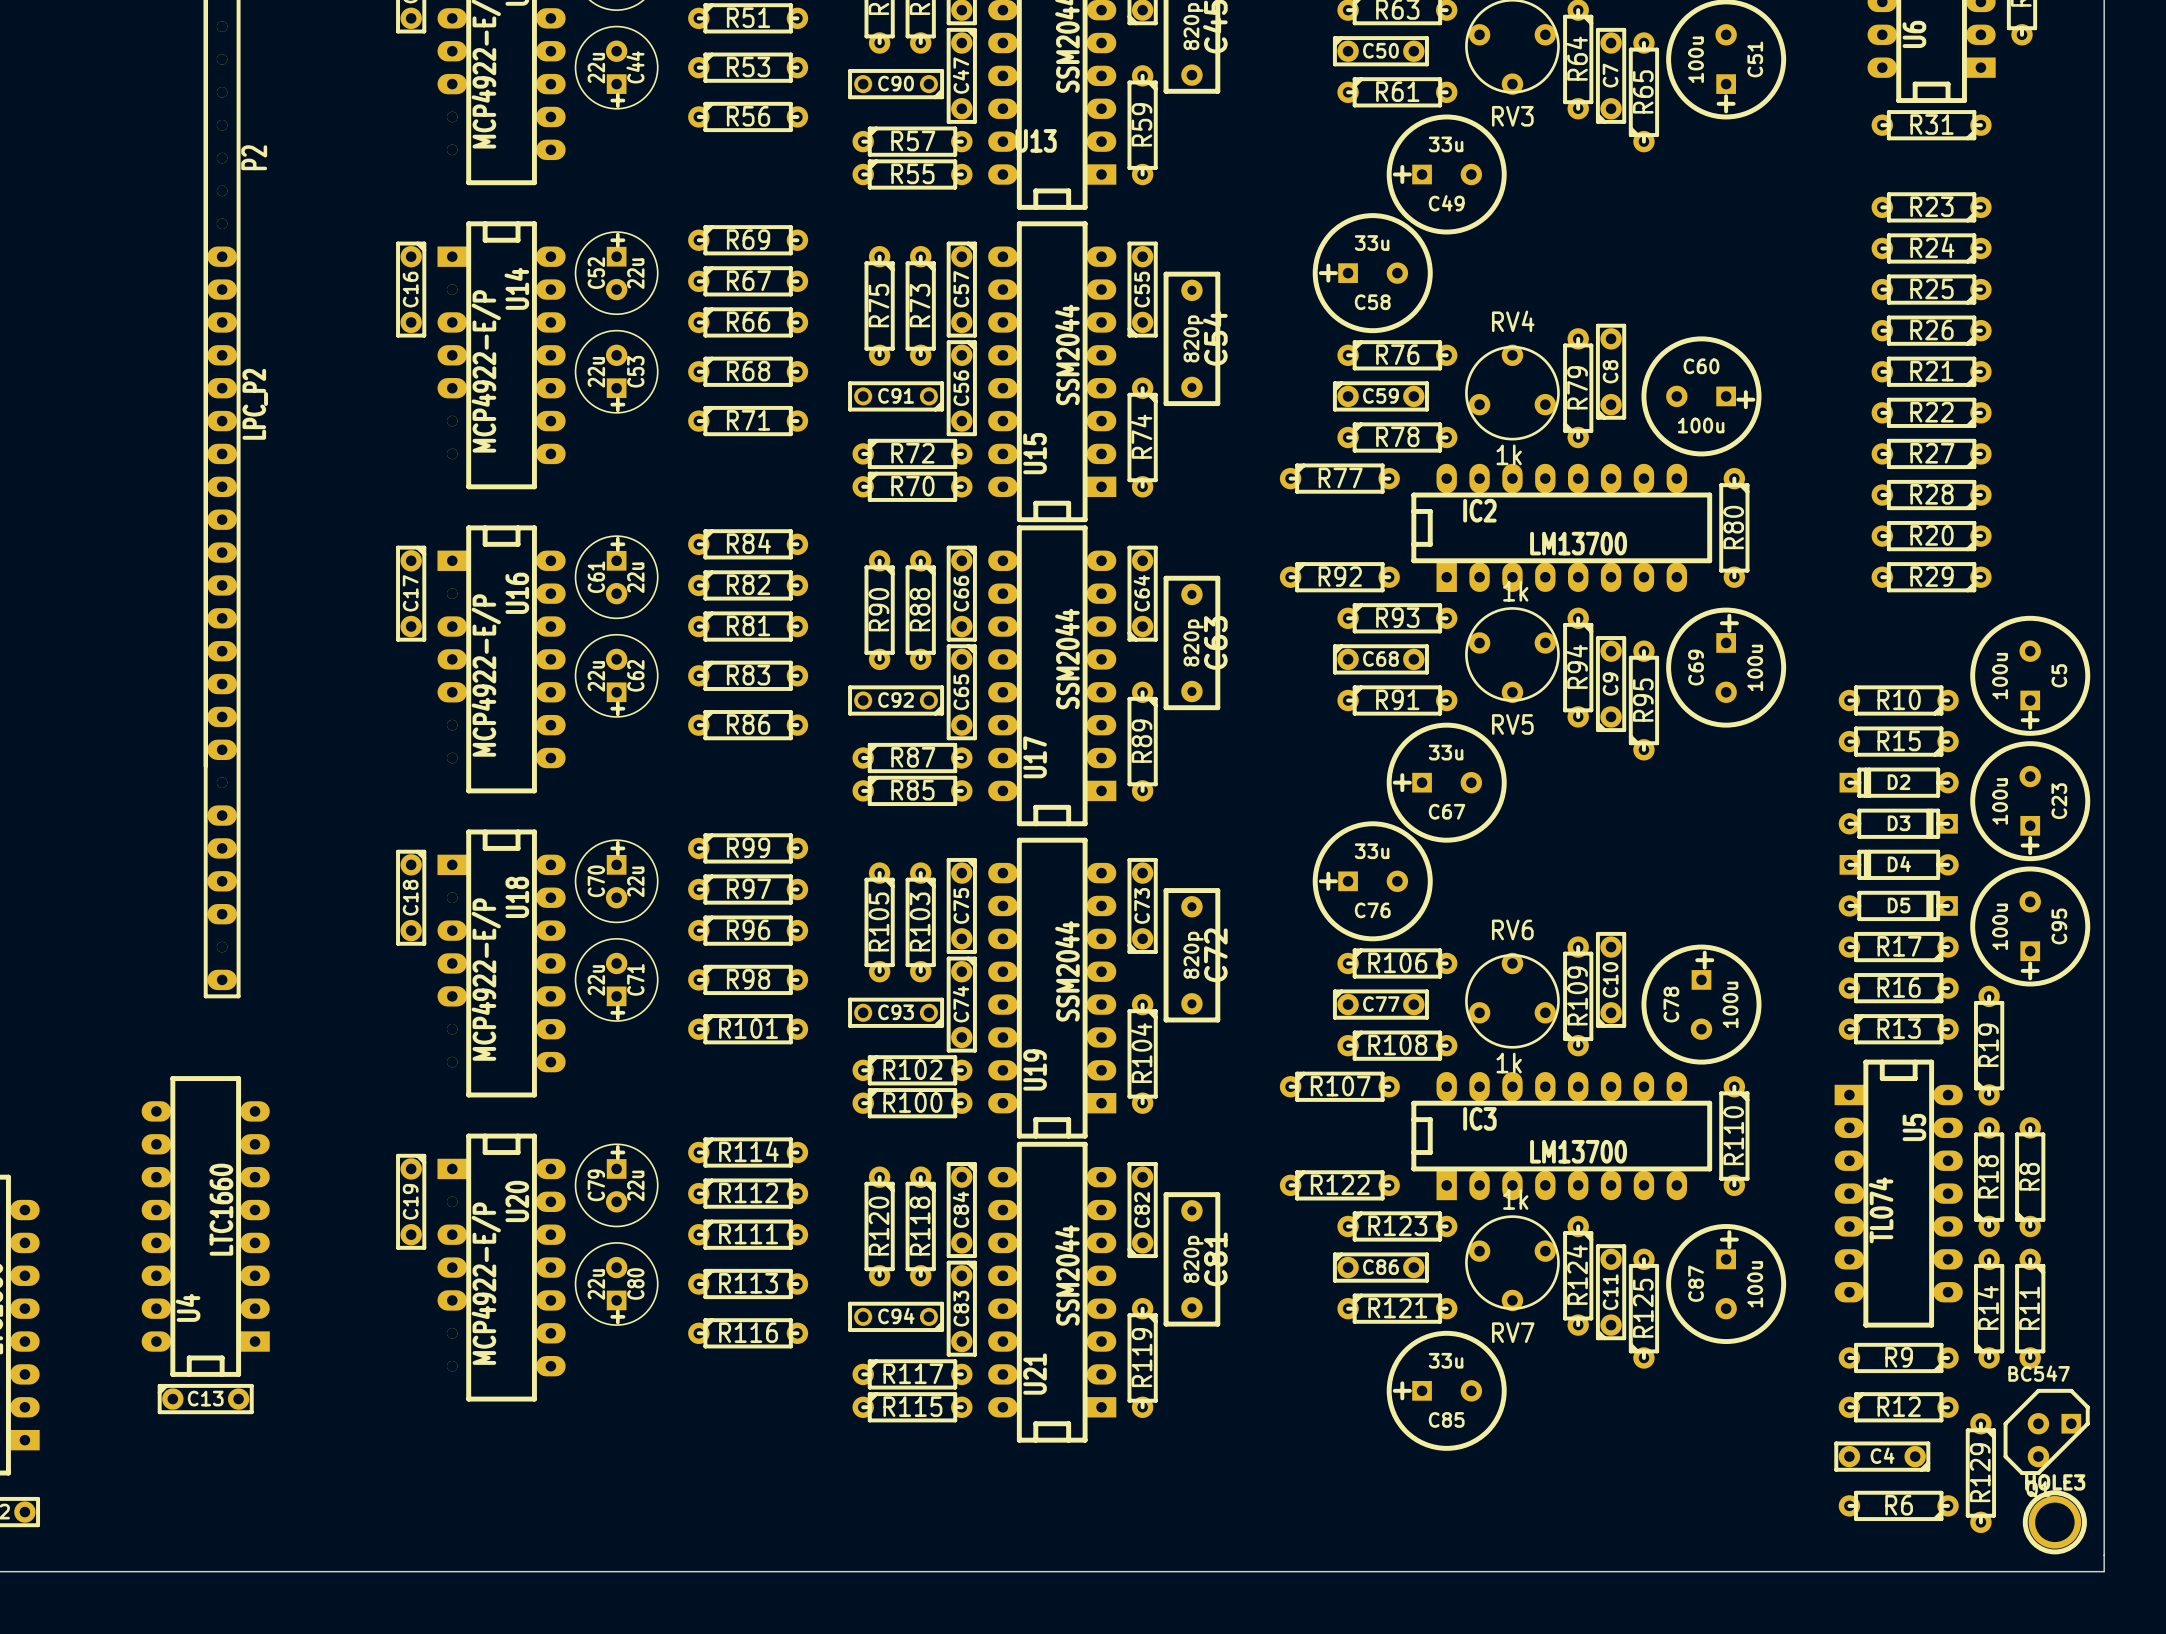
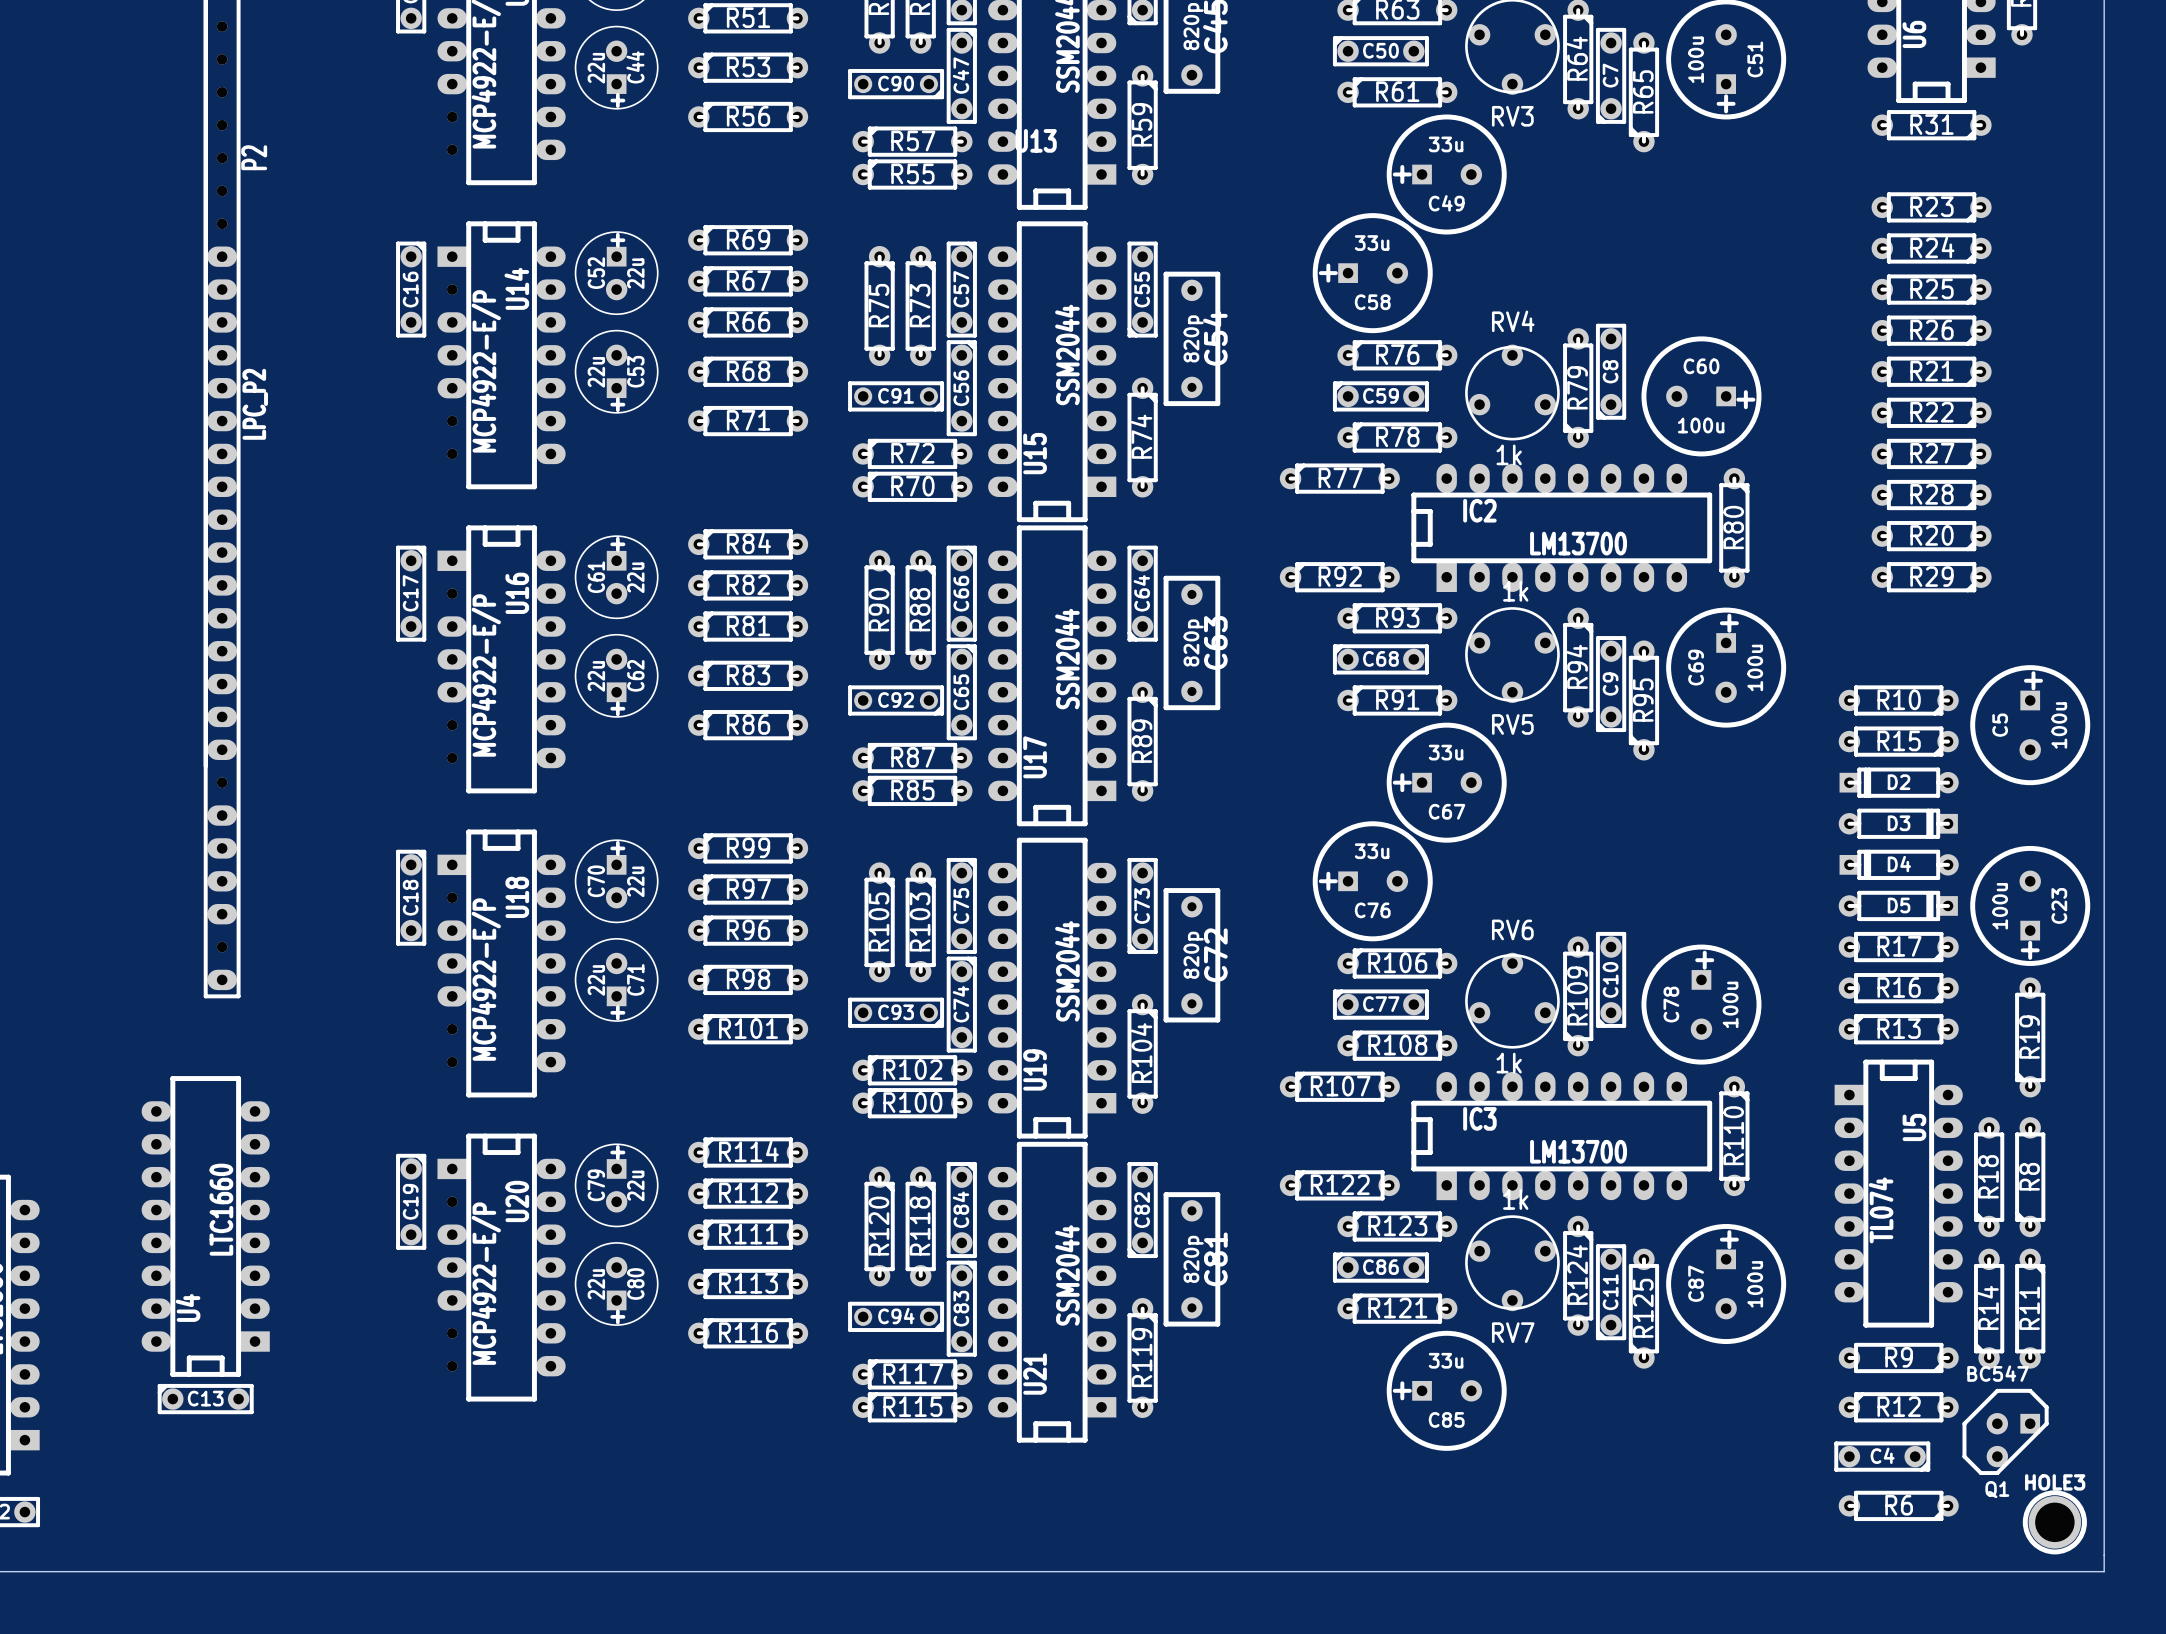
C5 rotation: 0° (2030, 675) -> 180° (2030, 725)
C23 position: (2030, 801) -> (2030, 905)
C95: 100u (2030, 926) -> none
R19 position: (1989, 1045) -> (2030, 1037)
Q1 position: (2046, 1431) -> (2005, 1431)
R129: (1980, 1473) -> none

